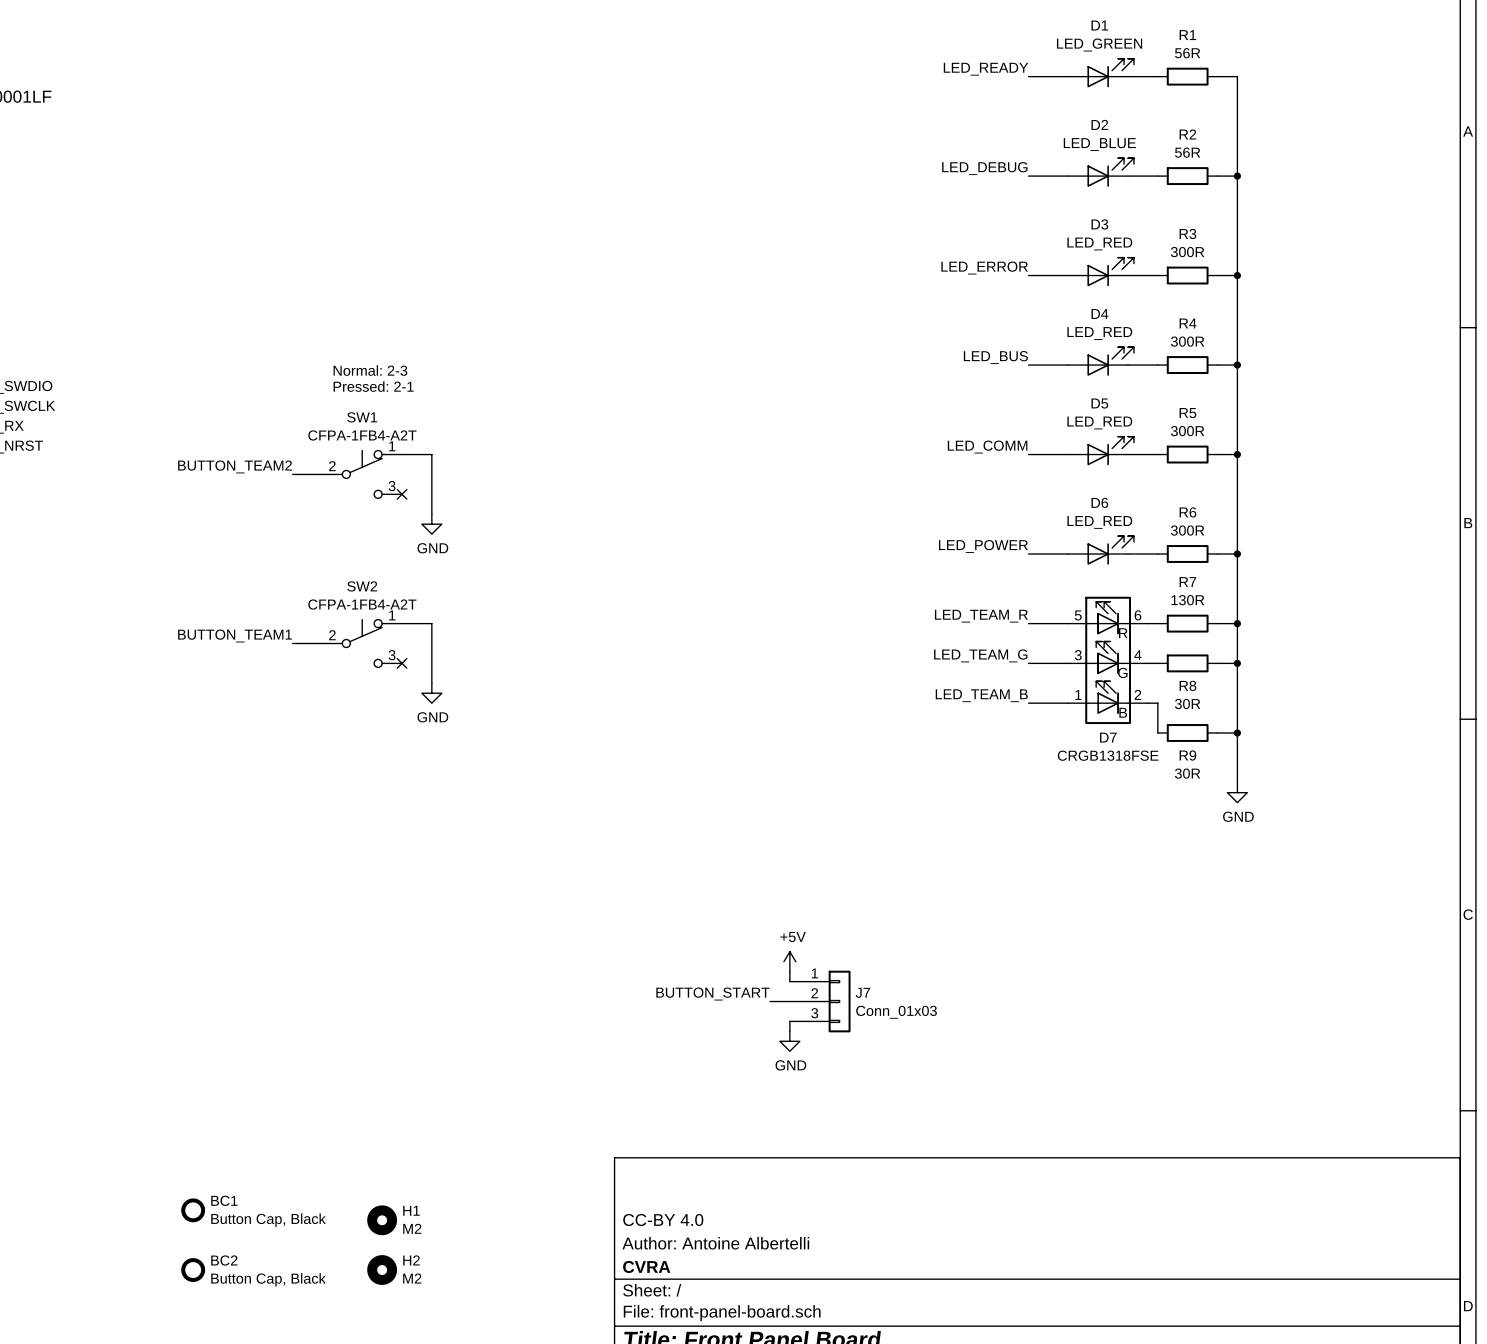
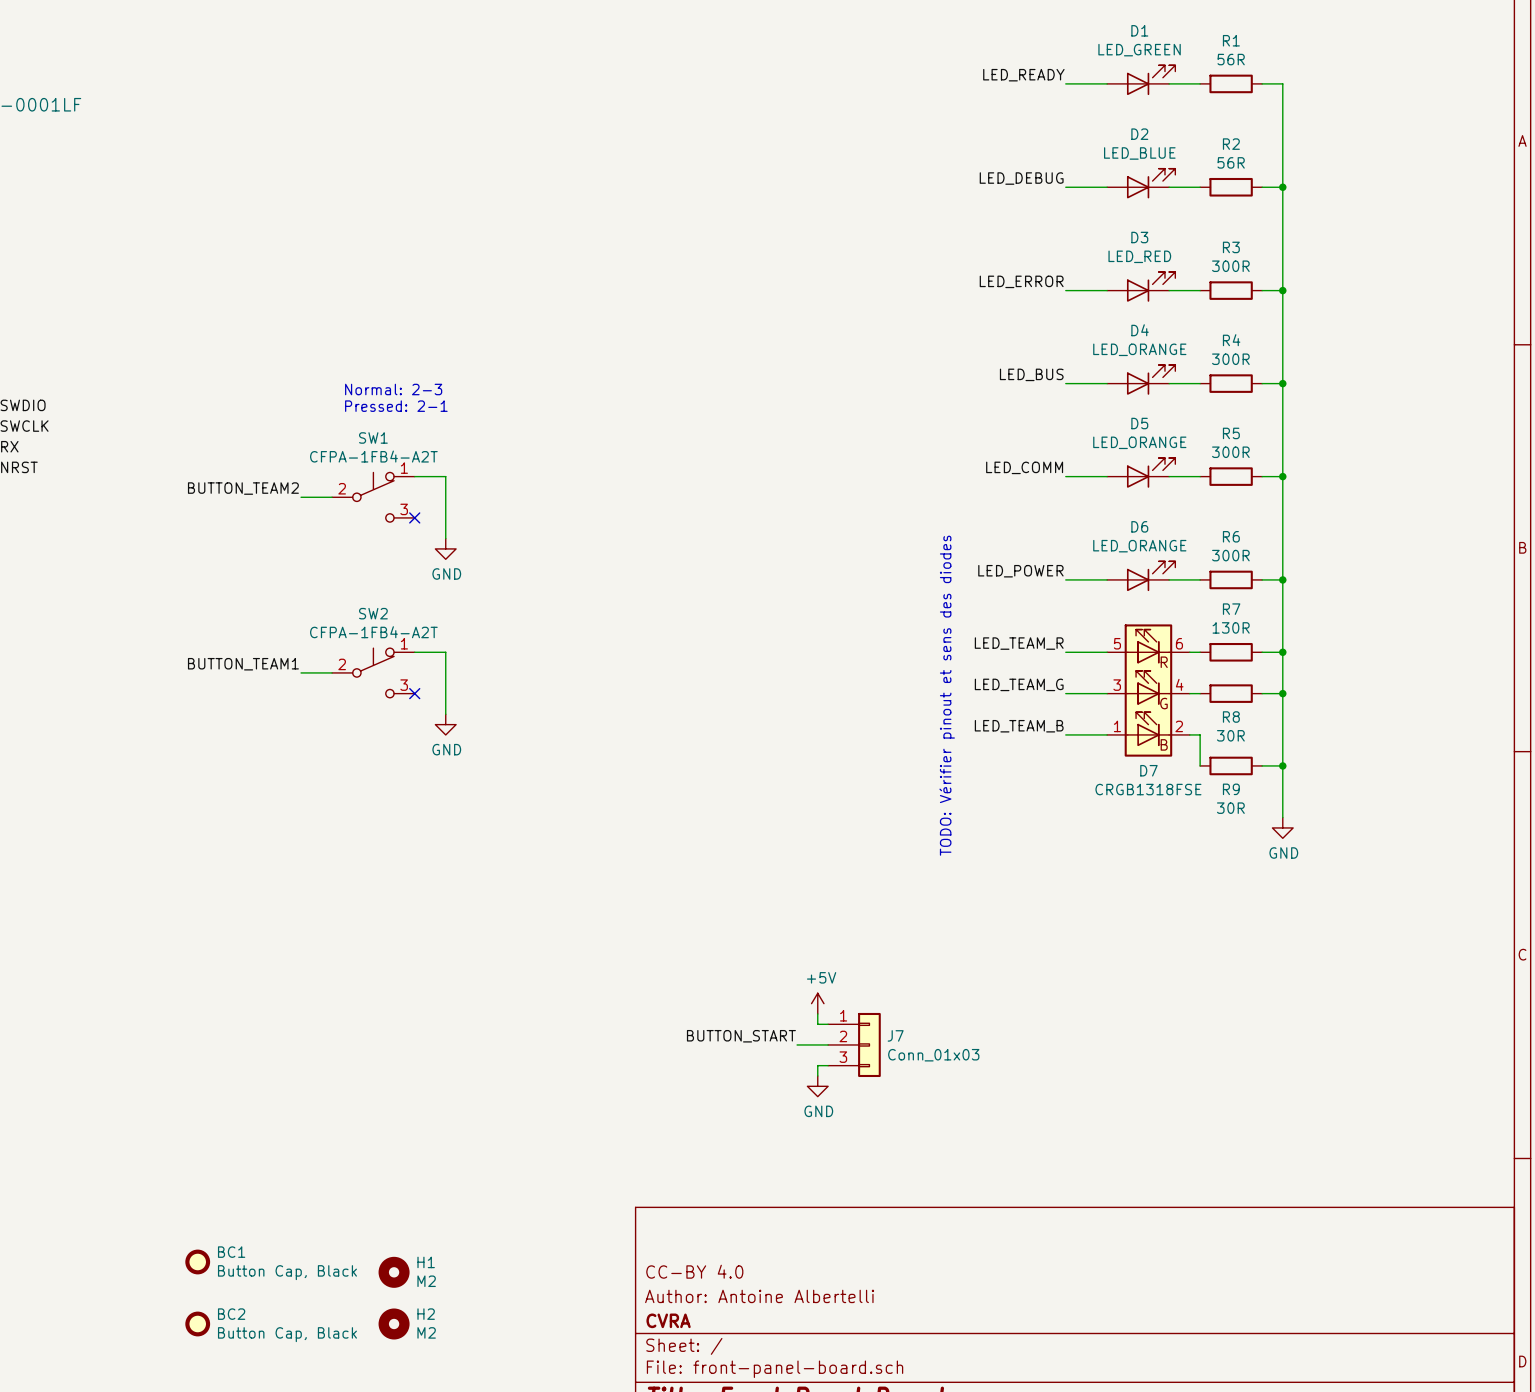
D4 value: LED_RED (1099, 333) -> LED_ORANGE (1139, 349)
D5 value: LED_RED (1099, 422) -> LED_ORANGE (1139, 442)
D6 value: LED_RED (1099, 522) -> LED_ORANGE (1139, 546)
text: none -> TODO: Vérifier pinout et sens des diodes (947, 695)

